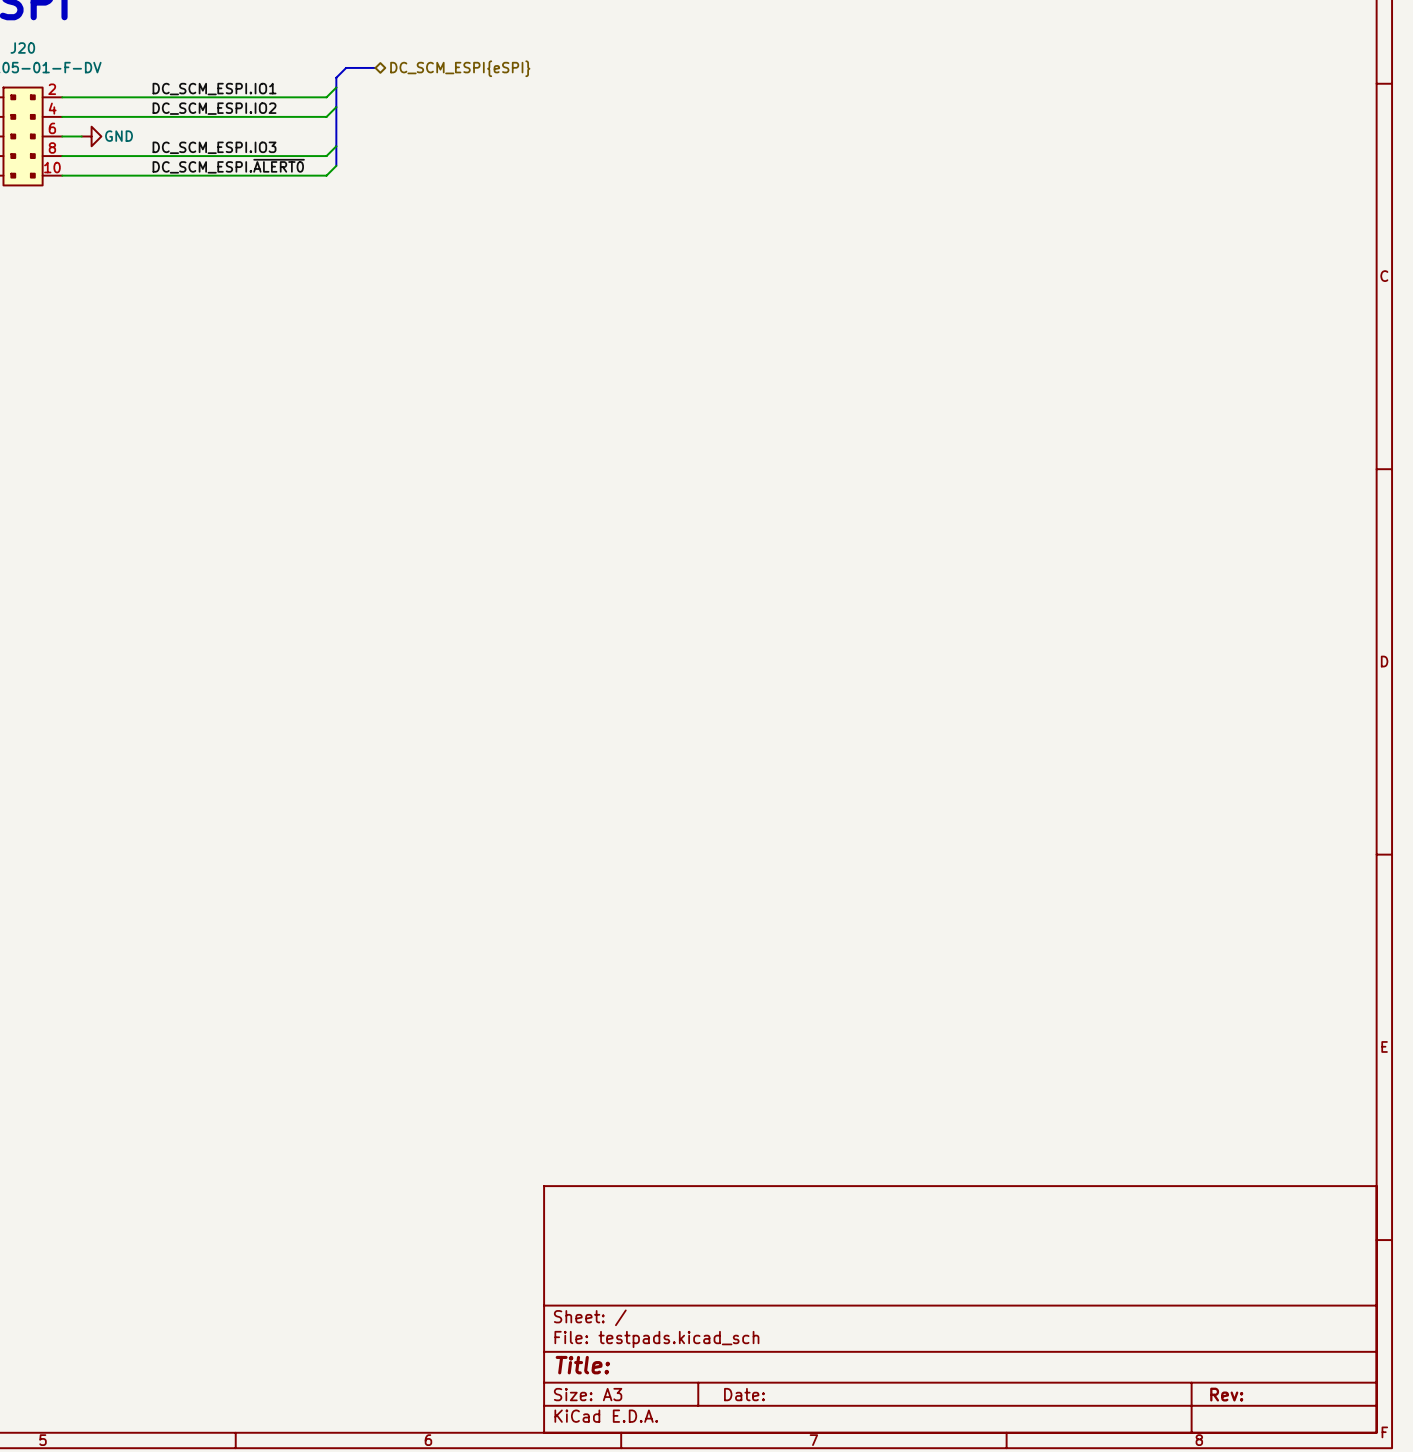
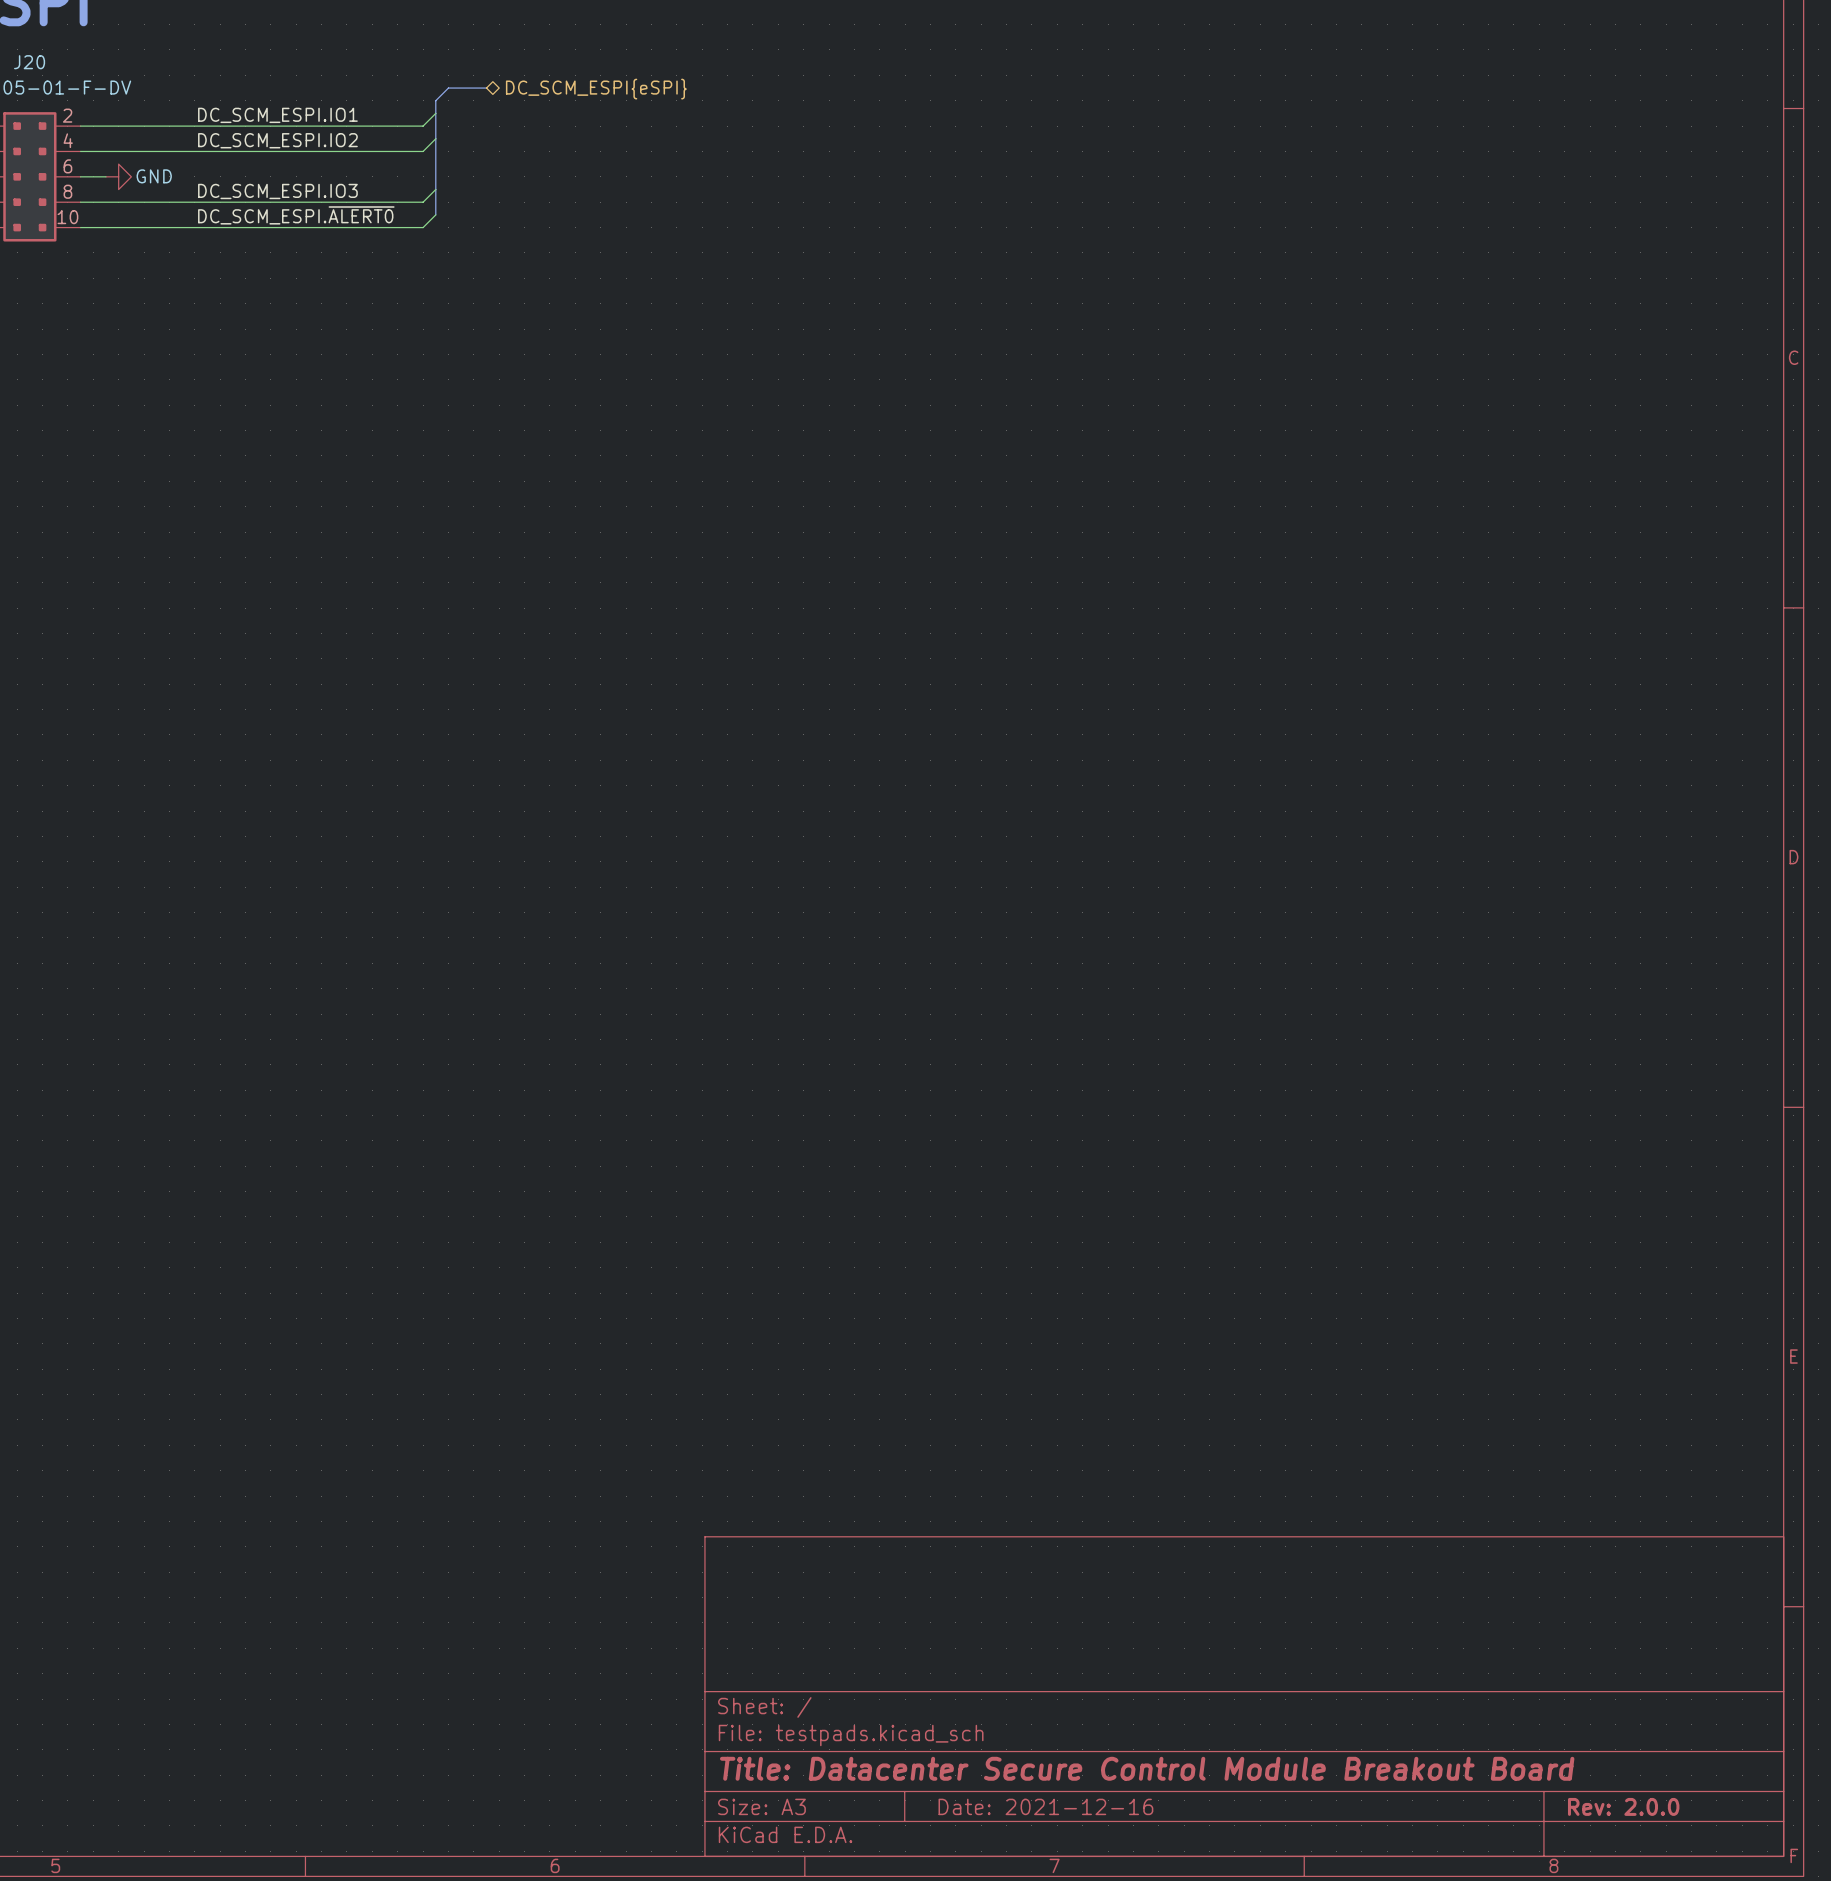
title block: Title: (582, 1365) -> Title: Datacenter Secure Control Module Breakout Board (1147, 1768)
title block: Date: (744, 1394) -> Date: 2021-12-16 (1045, 1806)
title block: Rev: (1226, 1394) -> Rev: 2.0.0 (1623, 1806)

